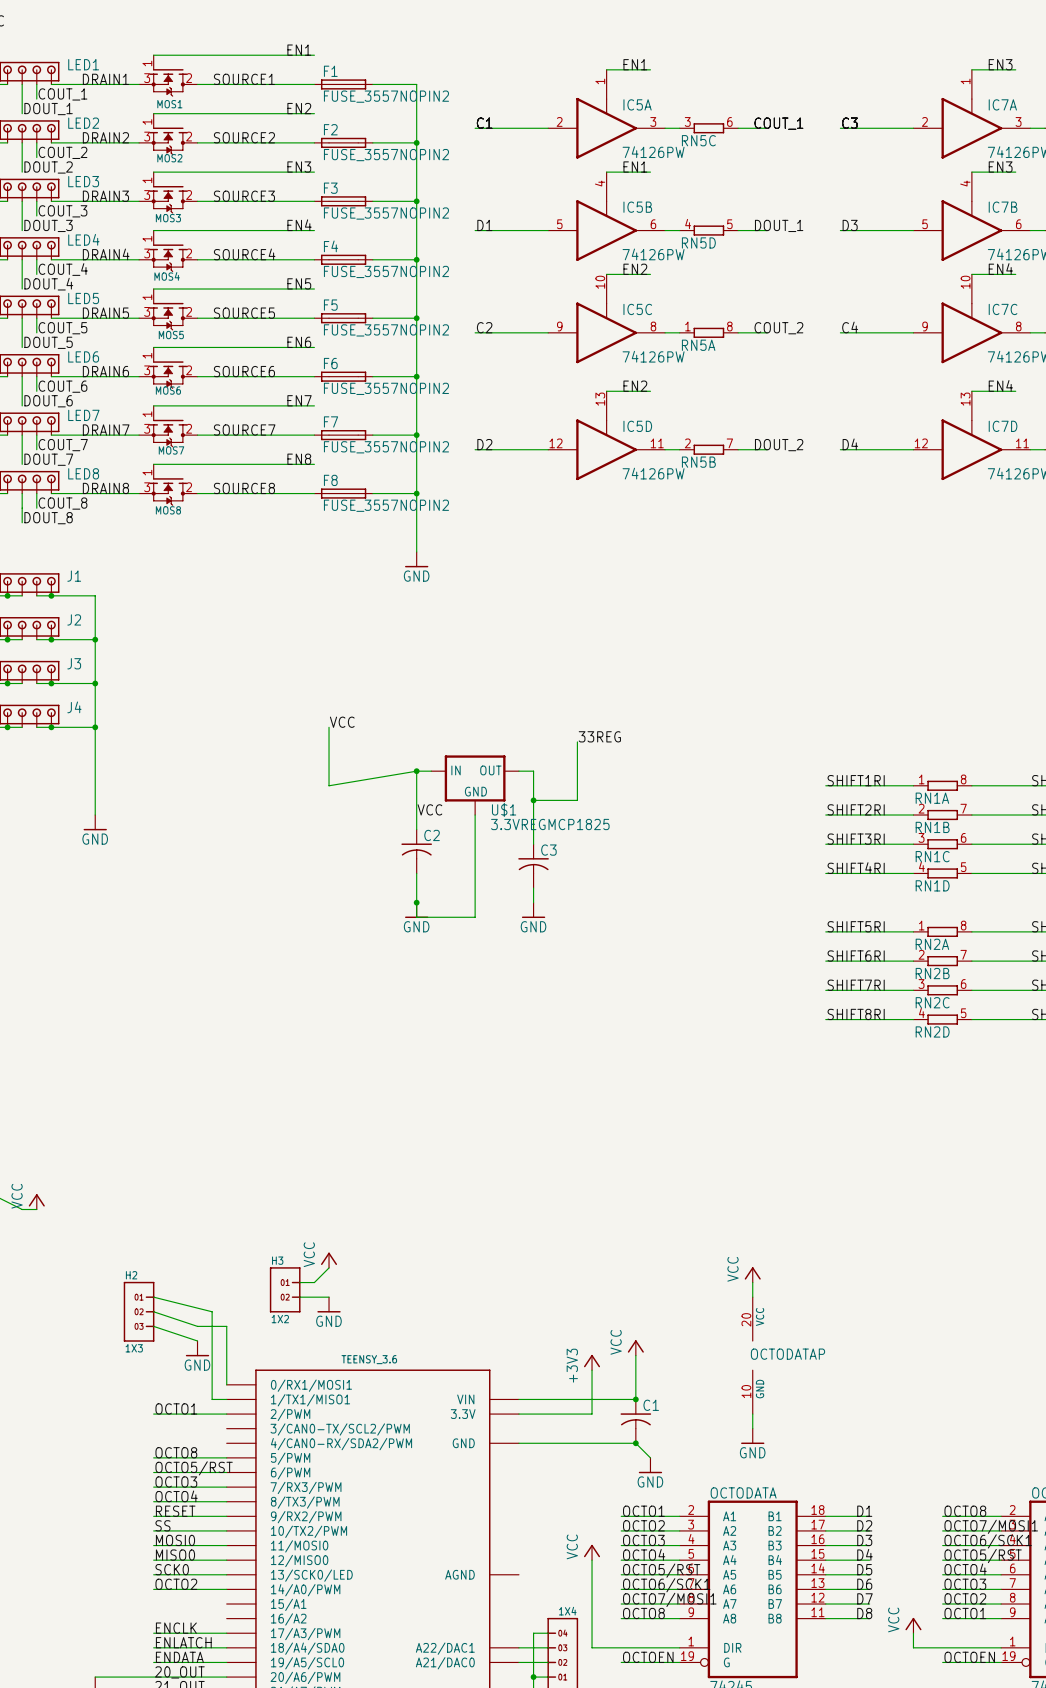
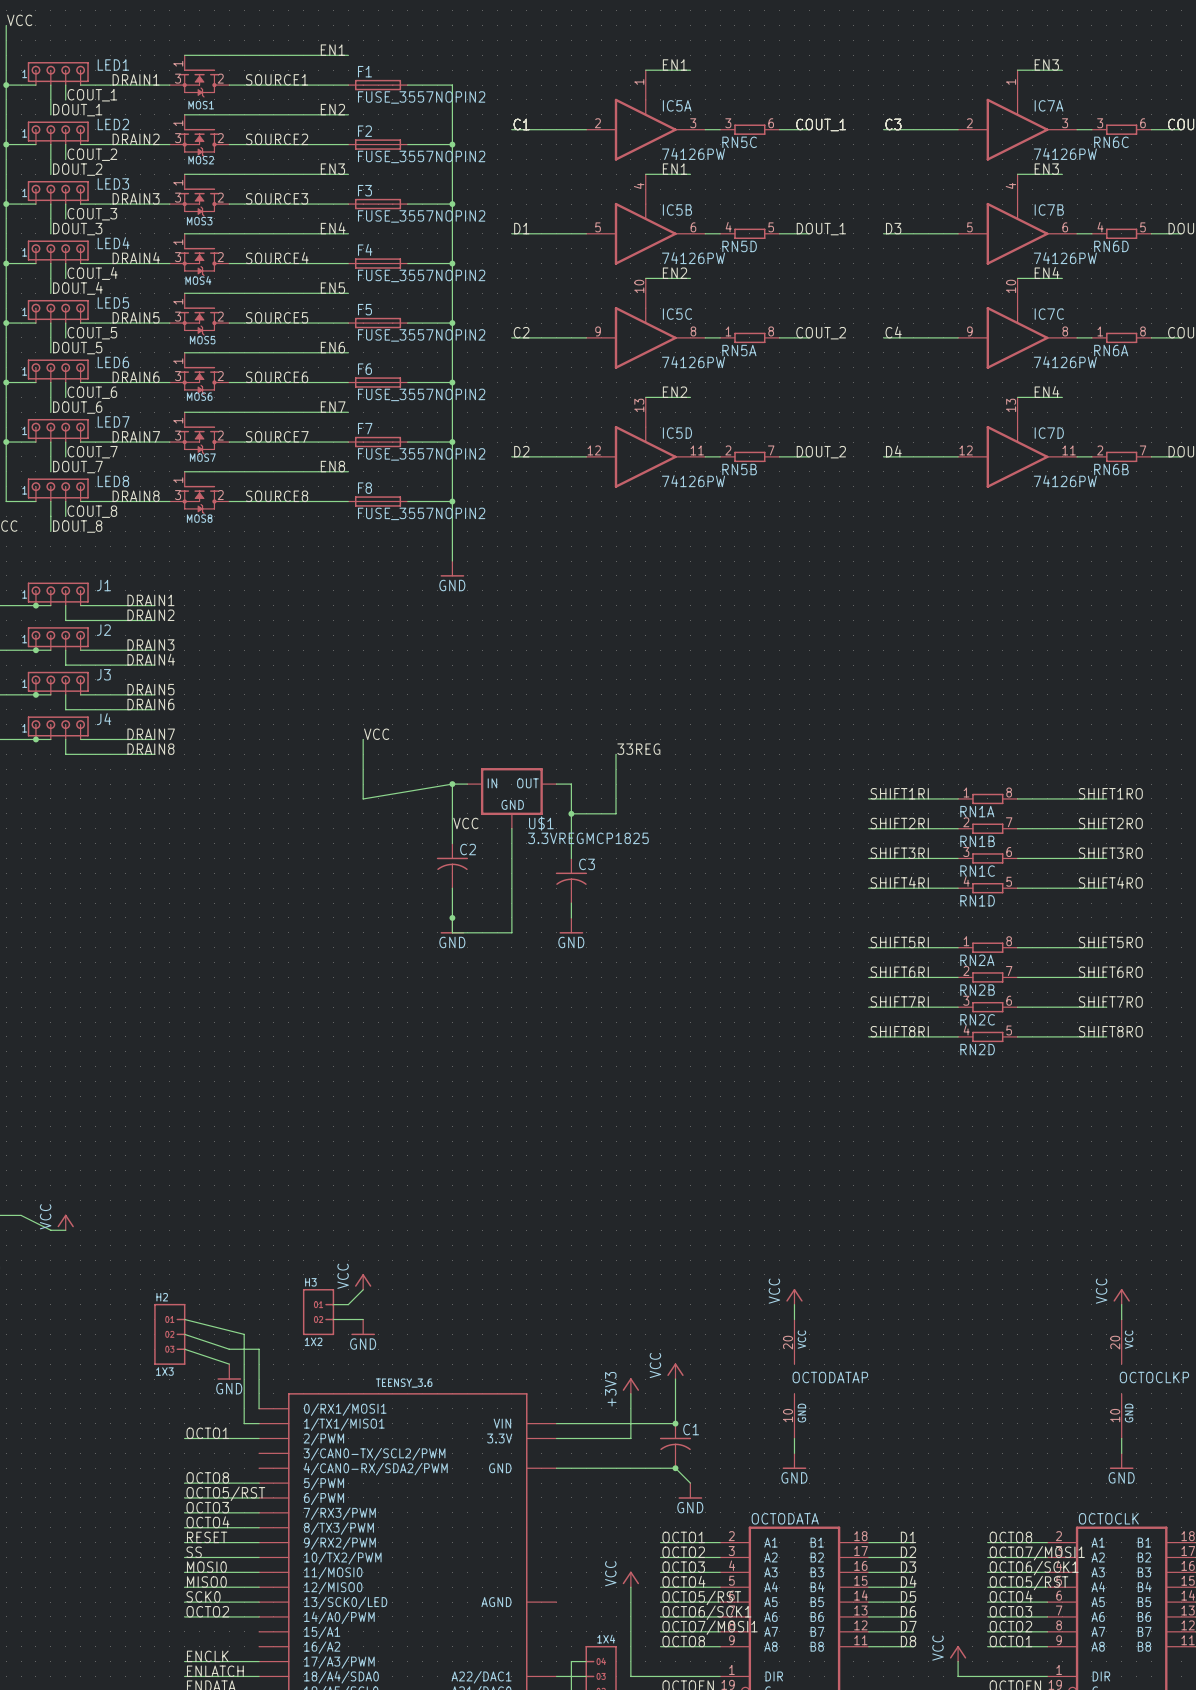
label: none -> DRAIN1 (150, 600)
wire: (36, 595) (51, 595) -> (65, 605) (65, 620) (154, 620)
junction: (51, 595) -> none
wire: (95, 595) (95, 815) -> (125, 605) (154, 605)
label: none -> DRAIN2 (150, 615)
label: none -> DRAIN3 (150, 645)
wire: (36, 639) (51, 639) -> (65, 650) (65, 665) (154, 665)
junction: (51, 639) -> none
wire: none -> (125, 650) (154, 650)
junction: (95, 639) -> none
label: none -> DRAIN4 (151, 659)
label: none -> DRAIN5 (150, 689)
wire: (36, 683) (51, 683) -> (65, 694) (65, 709) (154, 709)
junction: (51, 683) -> none
wire: none -> (125, 694) (154, 694)
junction: (95, 683) -> none
label: none -> DRAIN6 (150, 704)
label: none -> DRAIN7 (151, 734)
wire: (36, 727) (51, 727) -> (65, 739) (65, 754) (154, 754)
junction: (51, 727) -> none
wire: none -> (125, 739) (154, 739)
junction: (95, 727) -> none
label: none -> DRAIN8 (150, 749)
power symbol: GND (95, 822) -> none

